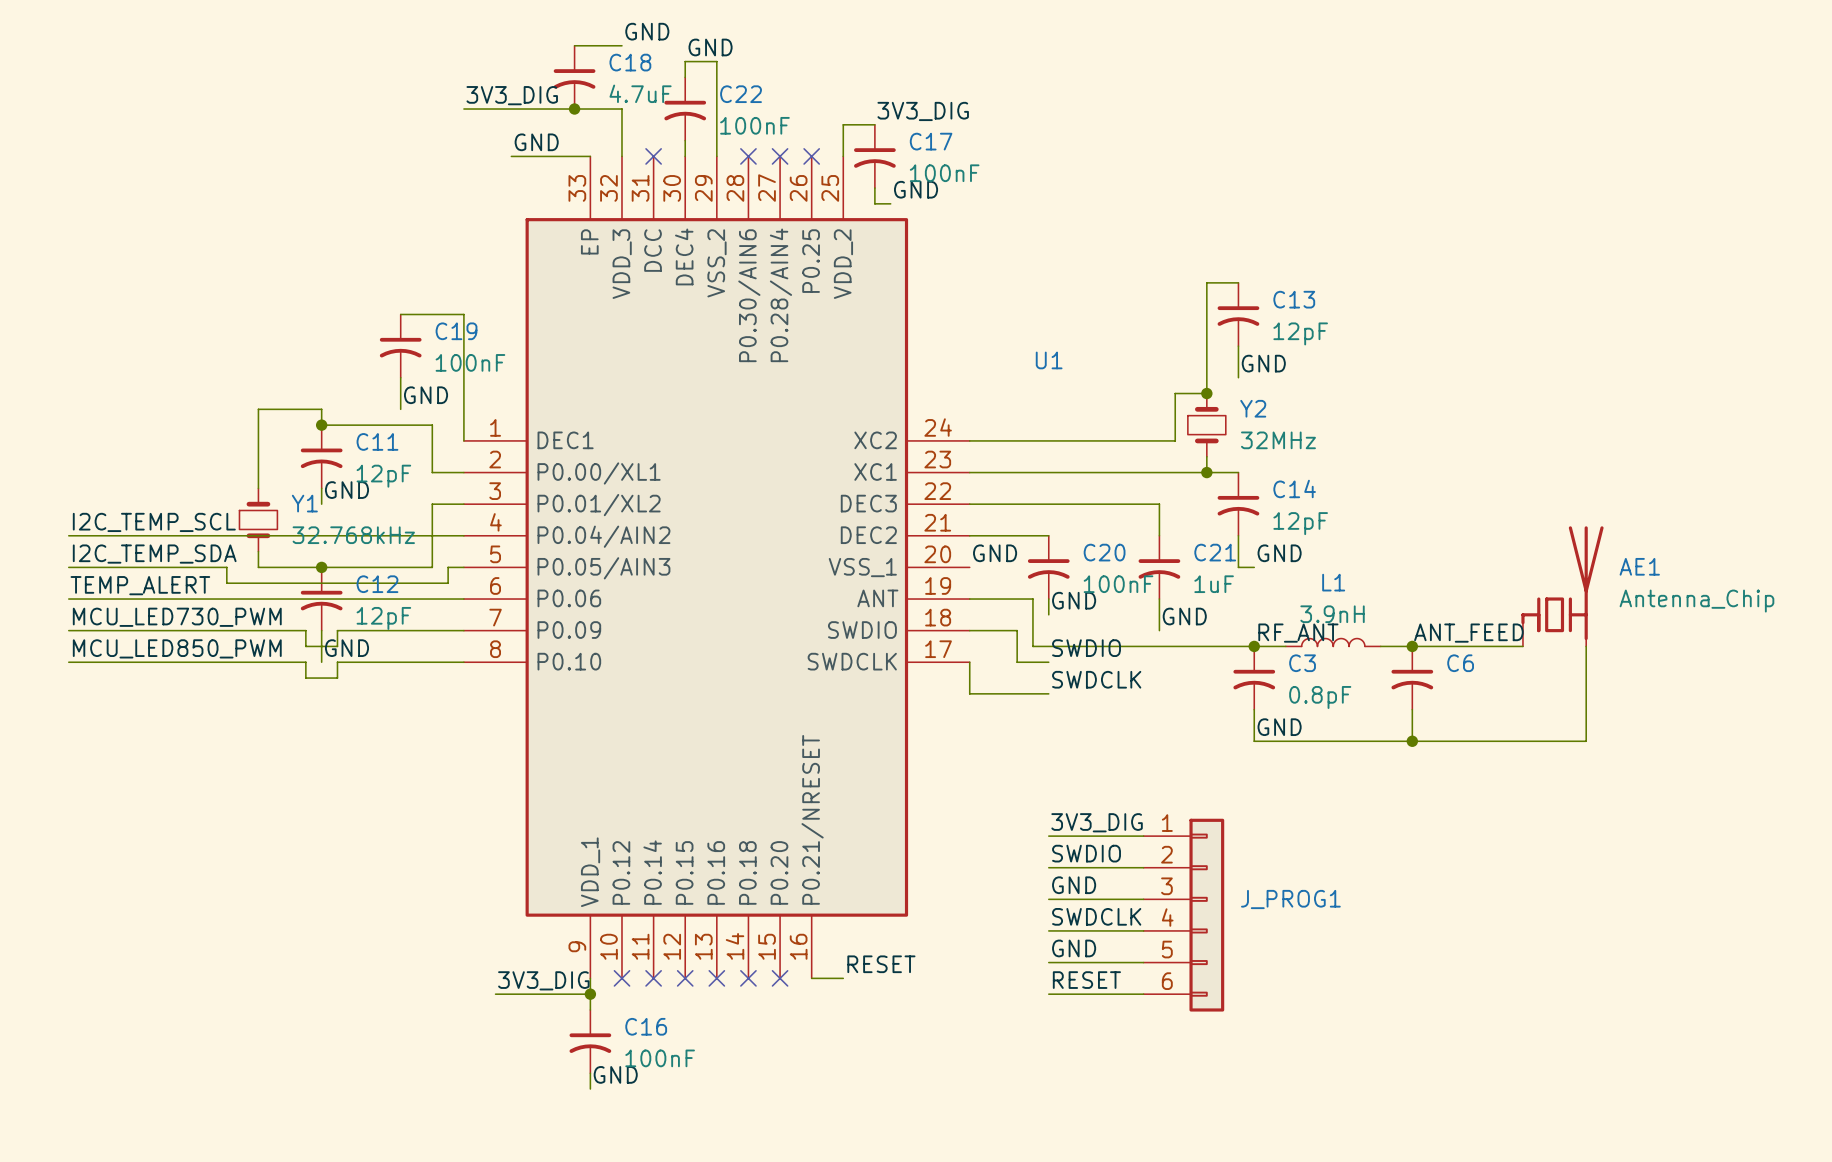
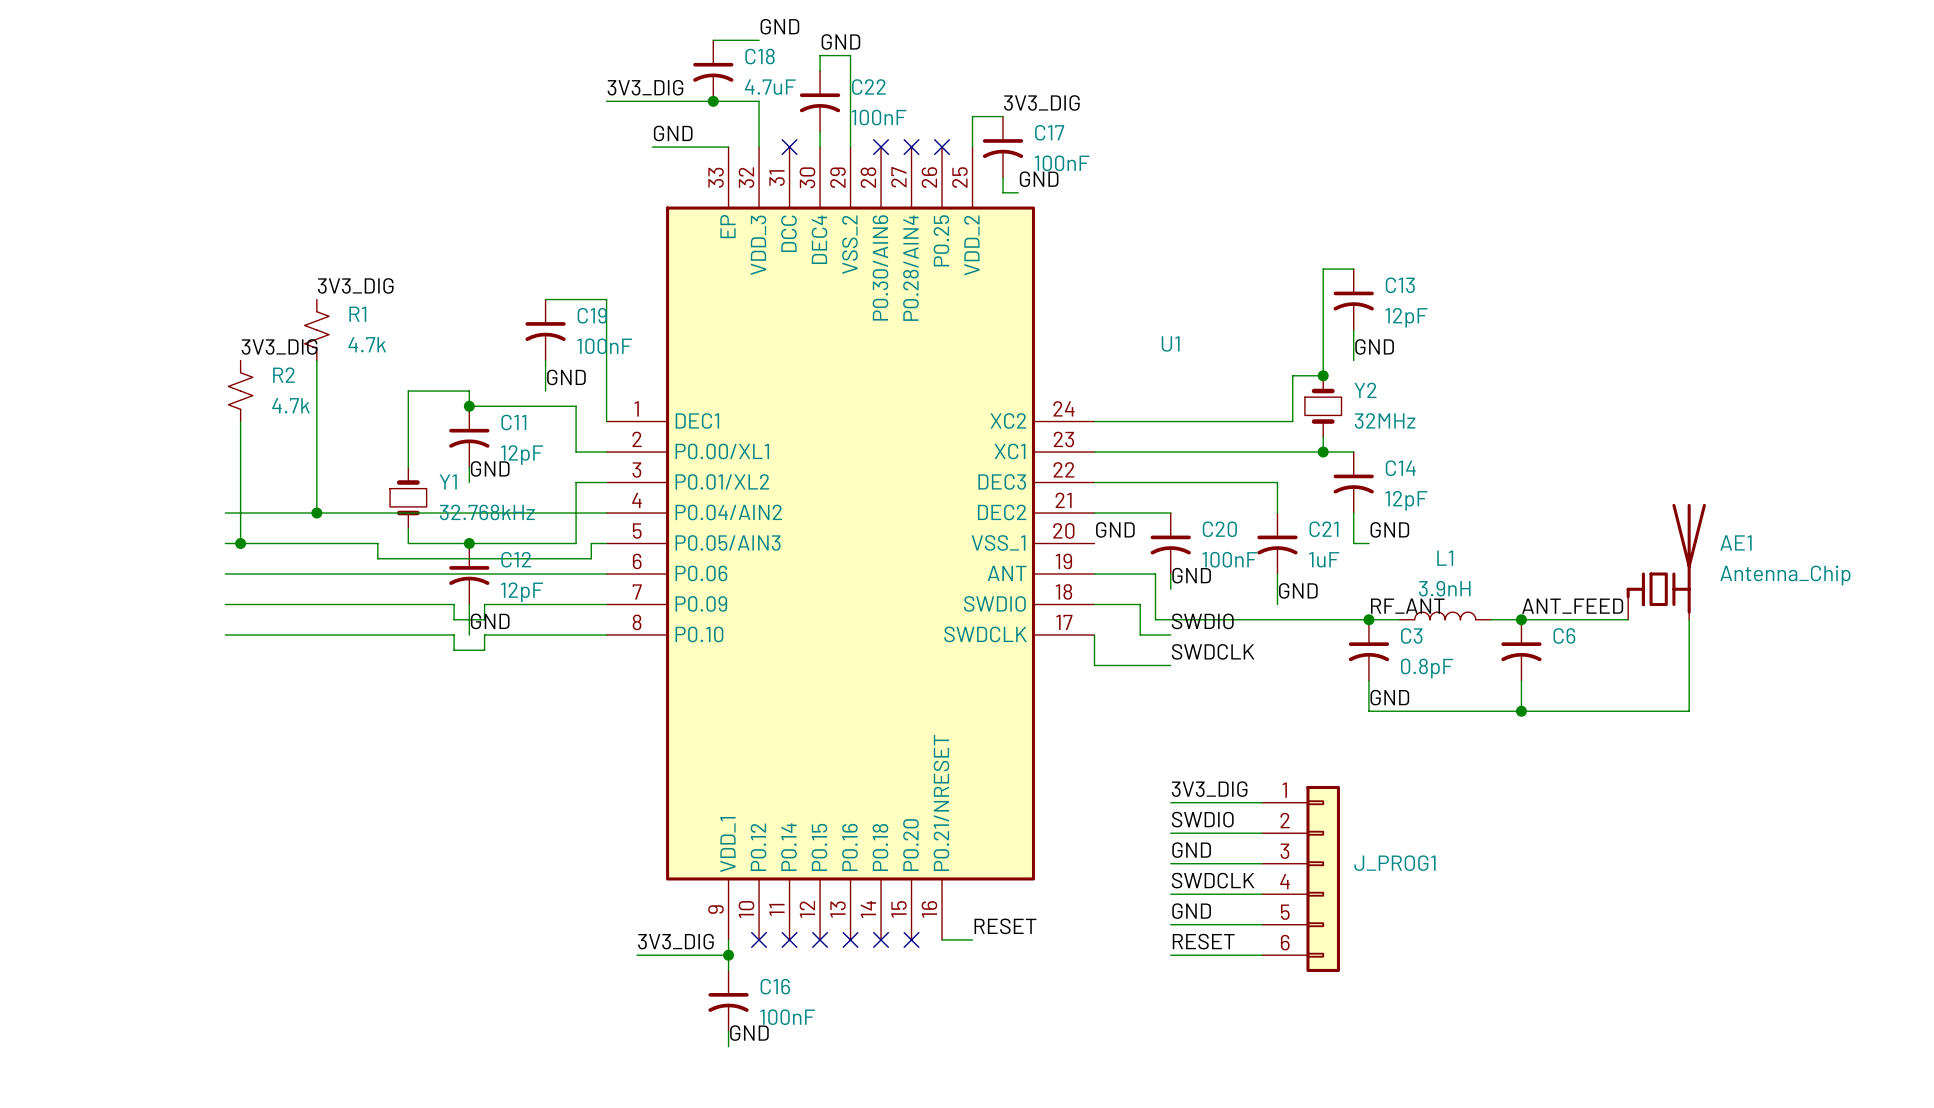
label: none -> 3V3_DIG (355, 285)
R1: none -> 4.7k (316, 330)
label: none -> 3V3_DIG (279, 346)
wire: none -> (316, 360) (316, 513)
R2: none -> 4.7k (240, 391)
wire: none -> (240, 421) (240, 543)
label: I2C_TEMP_SCL (154, 522) -> none
junction: none -> (316, 513)
label: I2C_TEMP_SDA (154, 554) -> none
junction: none -> (240, 543)
label: TEMP_ALERT (140, 585) -> none
label: MCU_LED730_PWM (177, 617) -> none
label: MCU_LED850_PWM (177, 648) -> none

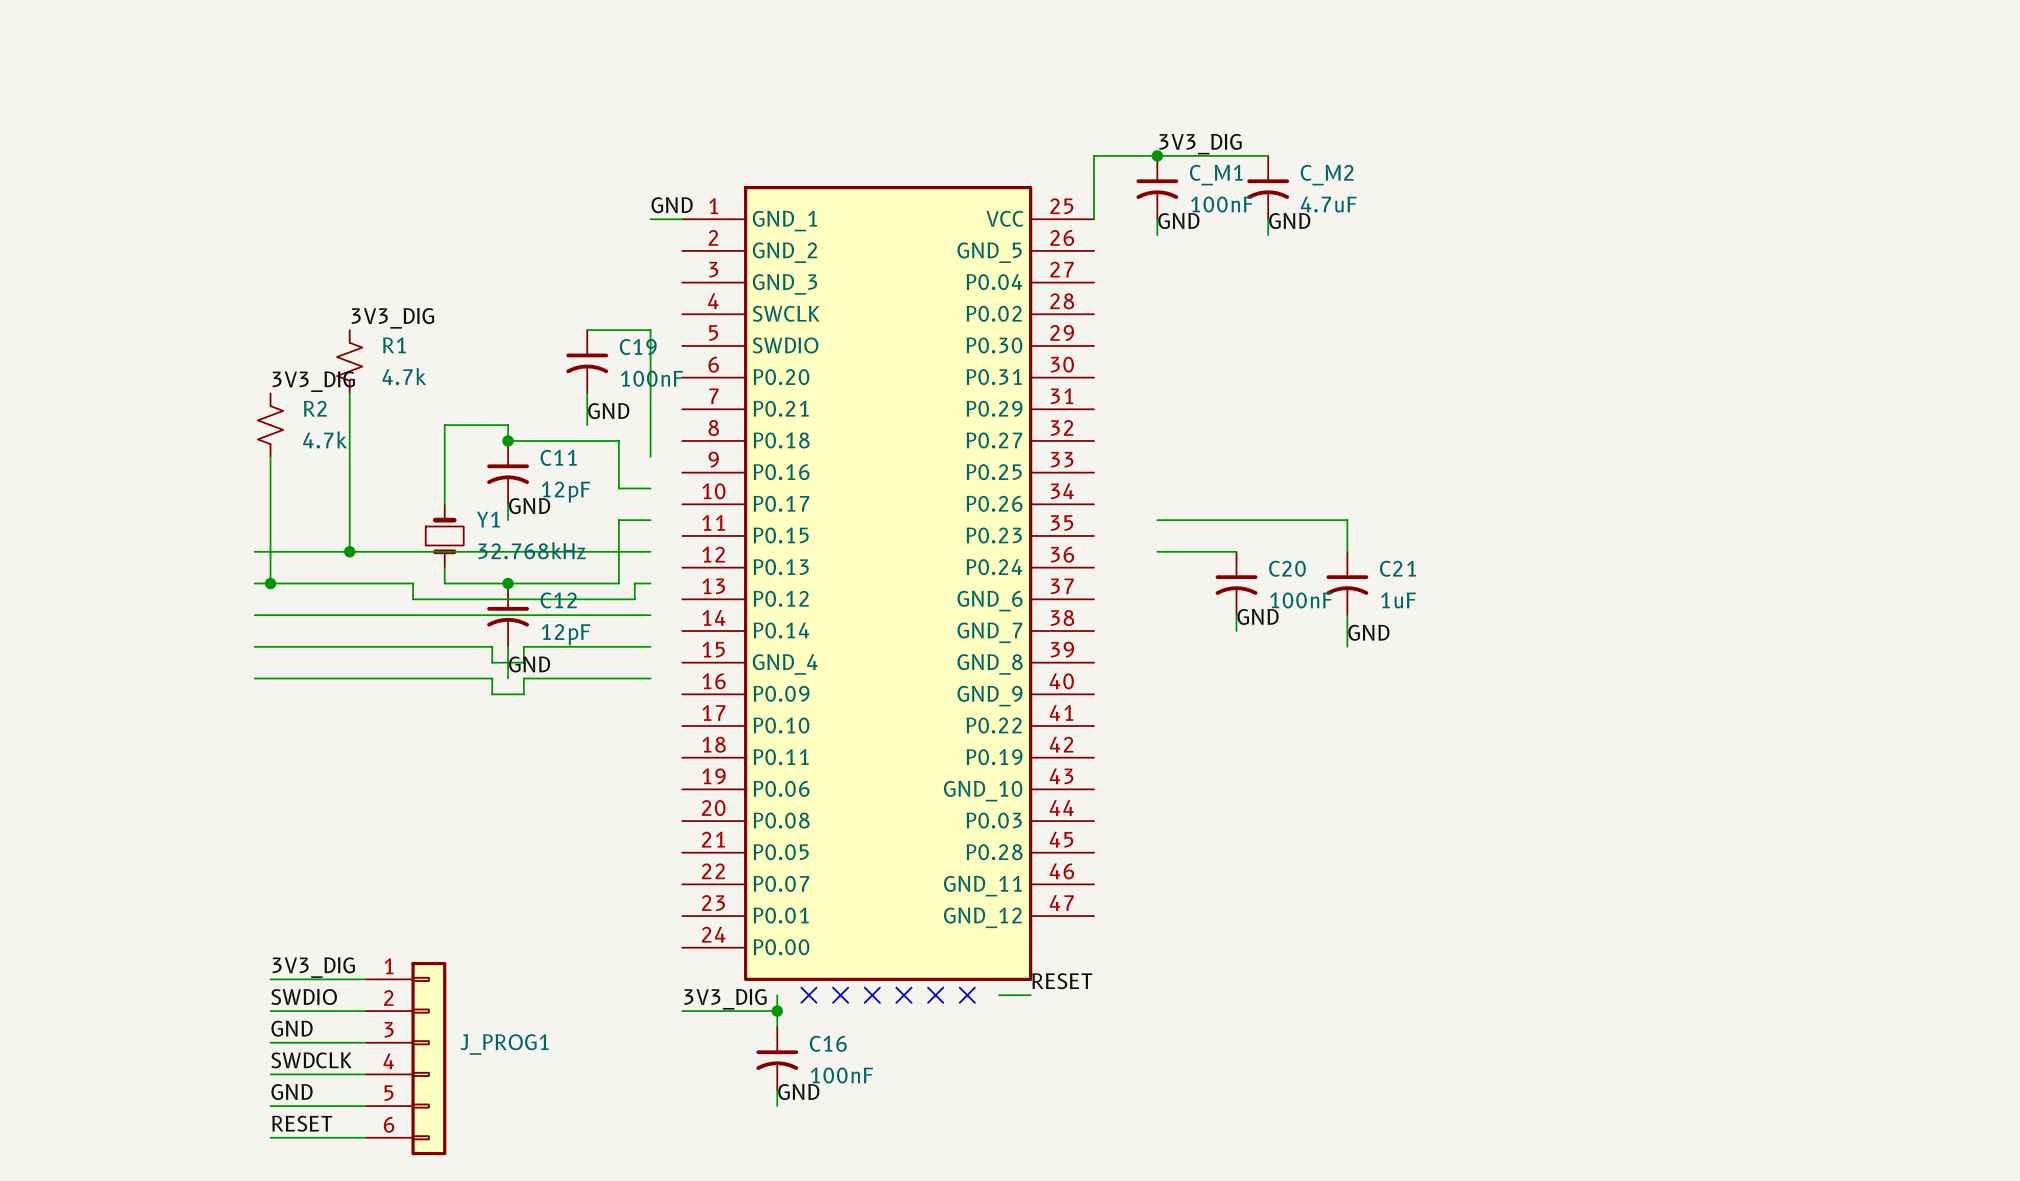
label: GND (779, 26) -> none
wire: (713, 40) (759, 40) -> none
label: GND (840, 41) -> none
C18: 4.7uF (713, 70) -> none
wire: (820, 70) (820, 55) (850, 55) (850, 147) -> none
label: 3V3_DIG (645, 87) -> none
wire: (606, 101) (759, 101) (759, 147) -> none
junction: (713, 101) -> none
C22: 100nF (820, 101) -> none
label position: 3V3_DIG (1041, 102) -> 3V3_DIG (1200, 144)
wire: (1003, 116) (972, 116) (972, 147) -> none
wire: (820, 131) (820, 147) -> (1157, 219) (1157, 235)
junction: none -> (1157, 155)
wire: none -> (1268, 155) (1093, 155) (1093, 219)
label position: GND (673, 133) -> GND (672, 205)
wire: (652, 147) (728, 147) -> none
no-connect mark: (789, 147) -> none
no-connect mark: (881, 147) -> none
no-connect mark: (911, 147) -> none
no-connect mark: (942, 147) -> none
C17: 100nF (1003, 147) -> none
C_M1: none -> 100nF (1157, 187)
C_M2: none -> 4.7uF (1268, 187)
wire: (1003, 177) (1003, 192) (1018, 192) -> none
label position: GND (1039, 179) -> GND (1178, 221)
wire: none -> (650, 219) (682, 219)
label: none -> GND (1289, 221)
wire: (1353, 269) (1323, 269) (1323, 375) (1292, 375) (1292, 421) (1094, 421) -> none
C13: 12pF (1353, 299) -> none
wire: (1353, 330) (1353, 360) -> none
label: GND (1374, 346) -> none
junction: (1323, 375) -> none
Y2: 32MHz (1323, 406) -> none
wire: (1323, 436) (1323, 452) -> (1268, 219) (1268, 235)
wire: (1094, 452) (1353, 452) -> none
junction: (1323, 452) -> none
C14: 12pF (1353, 482) -> none
wire: (1353, 513) (1353, 543) (1368, 543) -> none
label: GND (1115, 529) -> none
label: GND (1389, 529) -> none
part: none -> (888, 583)
U1: (850, 543) -> none
AE1: Antenna_Chip (1666, 561) -> none
wire: (1094, 574) (1155, 574) (1155, 619) (1399, 619) -> none
wire: (1094, 604) (1140, 604) (1140, 635) (1170, 635) -> none
label: RF_ANT (1407, 606) -> none
label: ANT_FEED (1572, 606) -> none
L1: 3.9nH (1445, 615) -> none
junction: (1368, 619) -> none
wire: (1490, 619) (1628, 619) -> none
junction: (1521, 619) -> none
wire: (1689, 619) (1689, 711) (1368, 711) (1368, 680) -> none
label: SWDIO (1202, 621) -> none
wire: (1094, 635) (1094, 665) (1170, 665) -> none
C3: 0.8pF (1368, 650) -> none
C6: (1521, 650) -> none
label: SWDCLK (1213, 651) -> none
wire: (1521, 680) (1521, 711) -> none
label: GND (1389, 697) -> none
junction: (1521, 711) -> none
label: 3V3_DIG (1209, 789) -> none
wire: (1170, 802) (1262, 802) -> none
label: SWDIO (1202, 819) -> none
wire: (1170, 833) (1262, 833) -> none
label: GND (1191, 850) -> none
wire: (1170, 863) (1262, 863) -> none
J_PROG1 position: (1301, 878) -> (405, 1058)
label: SWDCLK (1213, 880) -> none
wire: (1170, 894) (1262, 894) -> none
label: none -> 3V3_DIG (313, 967)
label: GND (1191, 911) -> none
wire: none -> (270, 979) (365, 979)
wire: (1170, 924) (1262, 924) -> none
label: none -> SWDIO (304, 997)
label: RESET (1203, 941) -> none
wire: none -> (270, 1011) (365, 1011)
wire: (1170, 955) (1262, 955) -> none
label: none -> GND (292, 1028)
wire: none -> (270, 1042) (365, 1042)
label: none -> SWDCLK (311, 1060)
wire: none -> (270, 1074) (365, 1074)
label: none -> GND (292, 1092)
wire: none -> (270, 1106) (365, 1106)
label: none -> RESET (302, 1123)
wire: none -> (270, 1137) (365, 1137)

